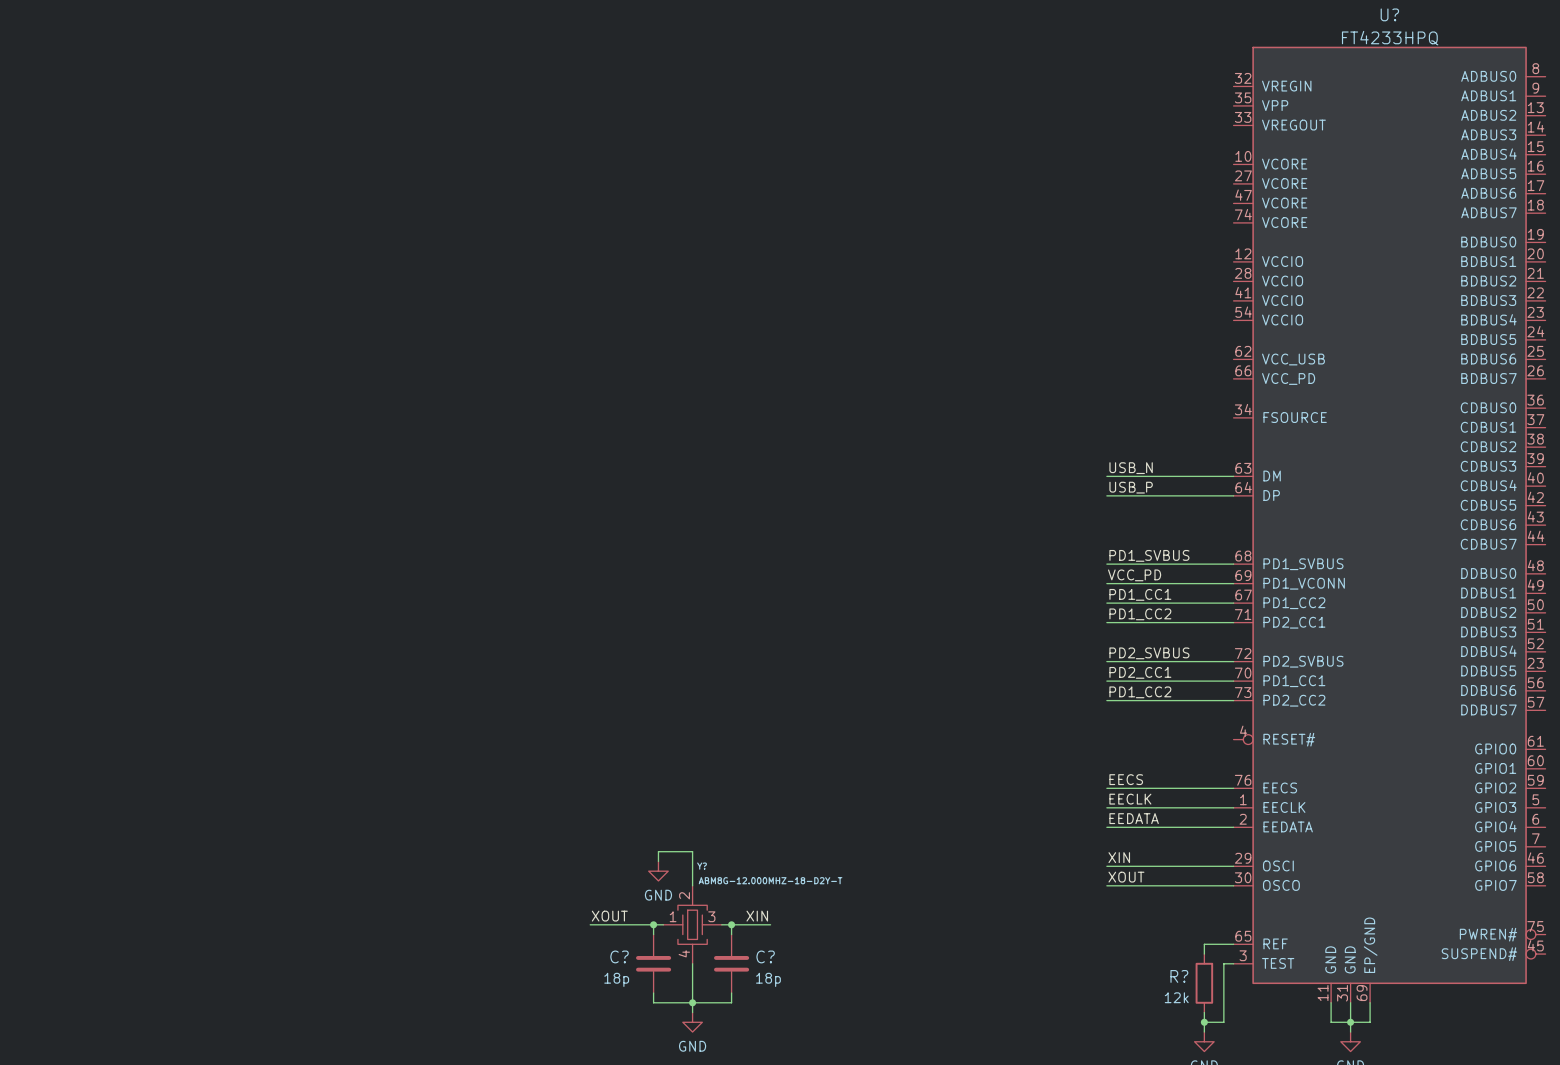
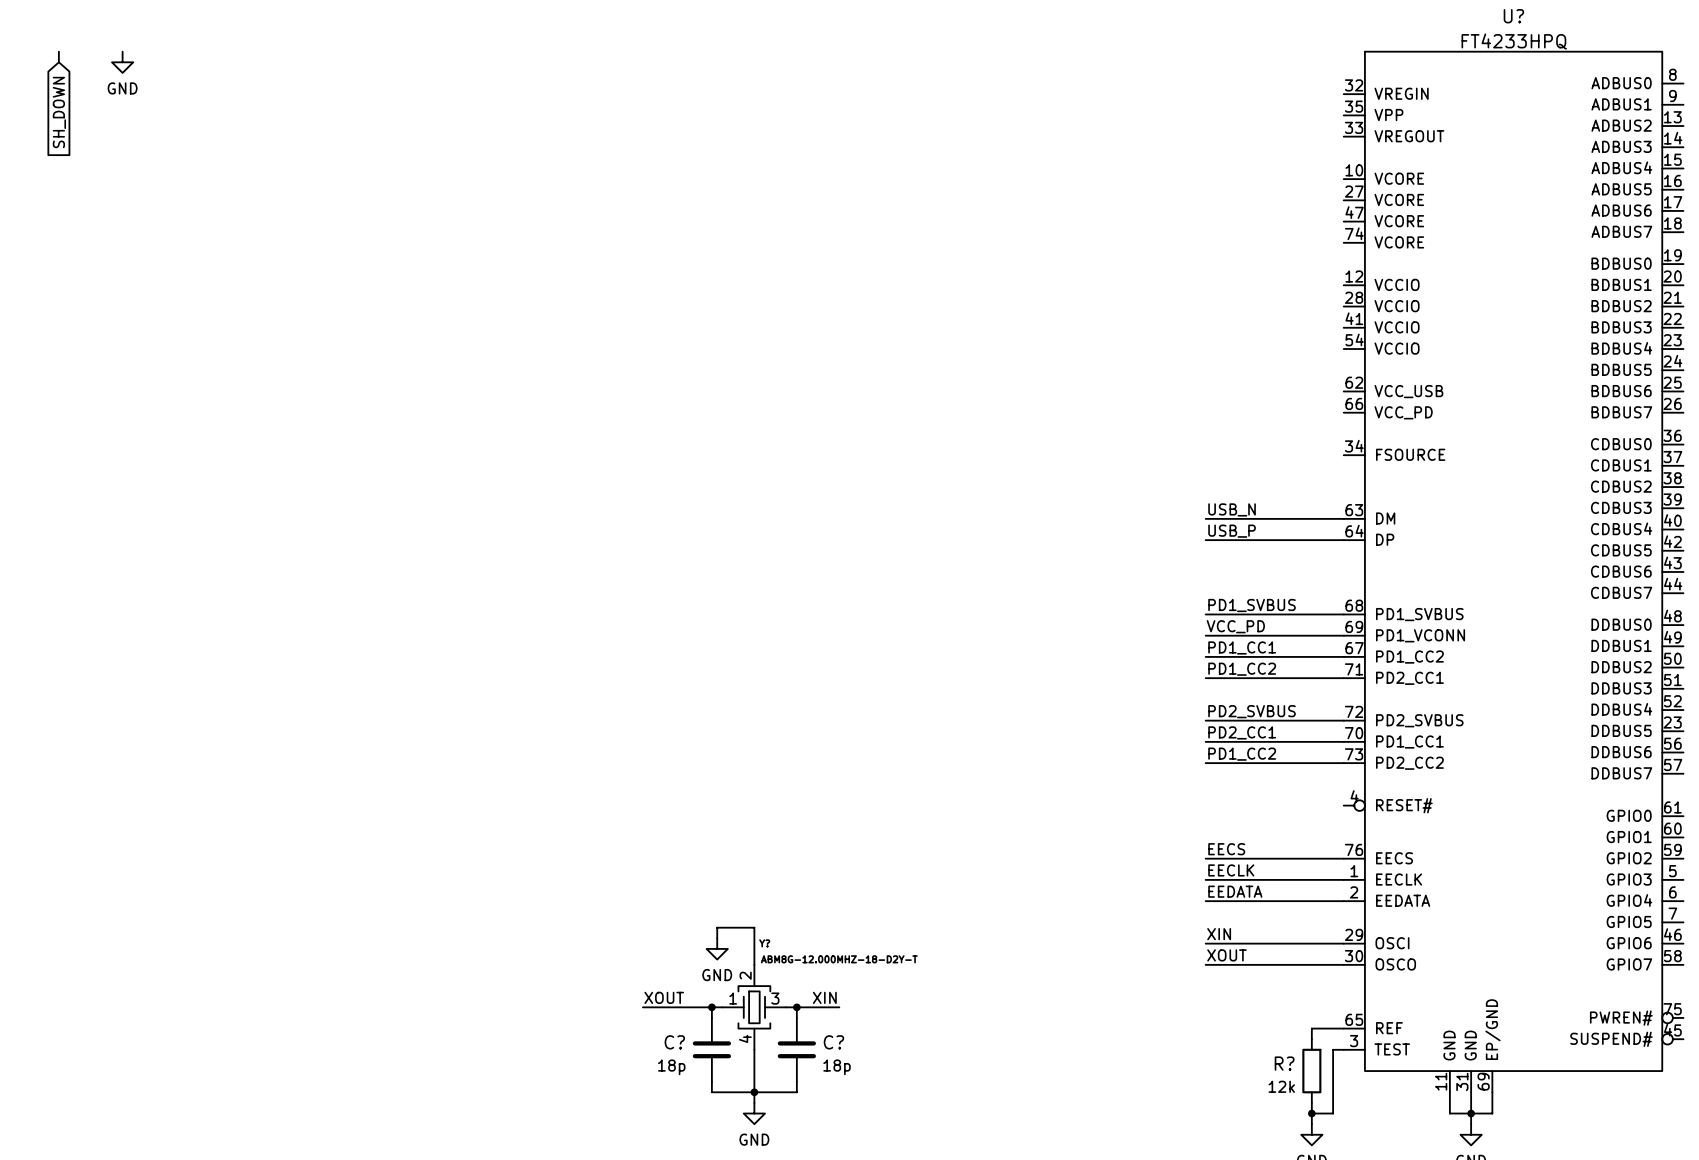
wire: none -> (58, 51) (58, 62)
power symbol: none -> GND (122, 62)
global label: none -> SH_DOWN (59, 112)

